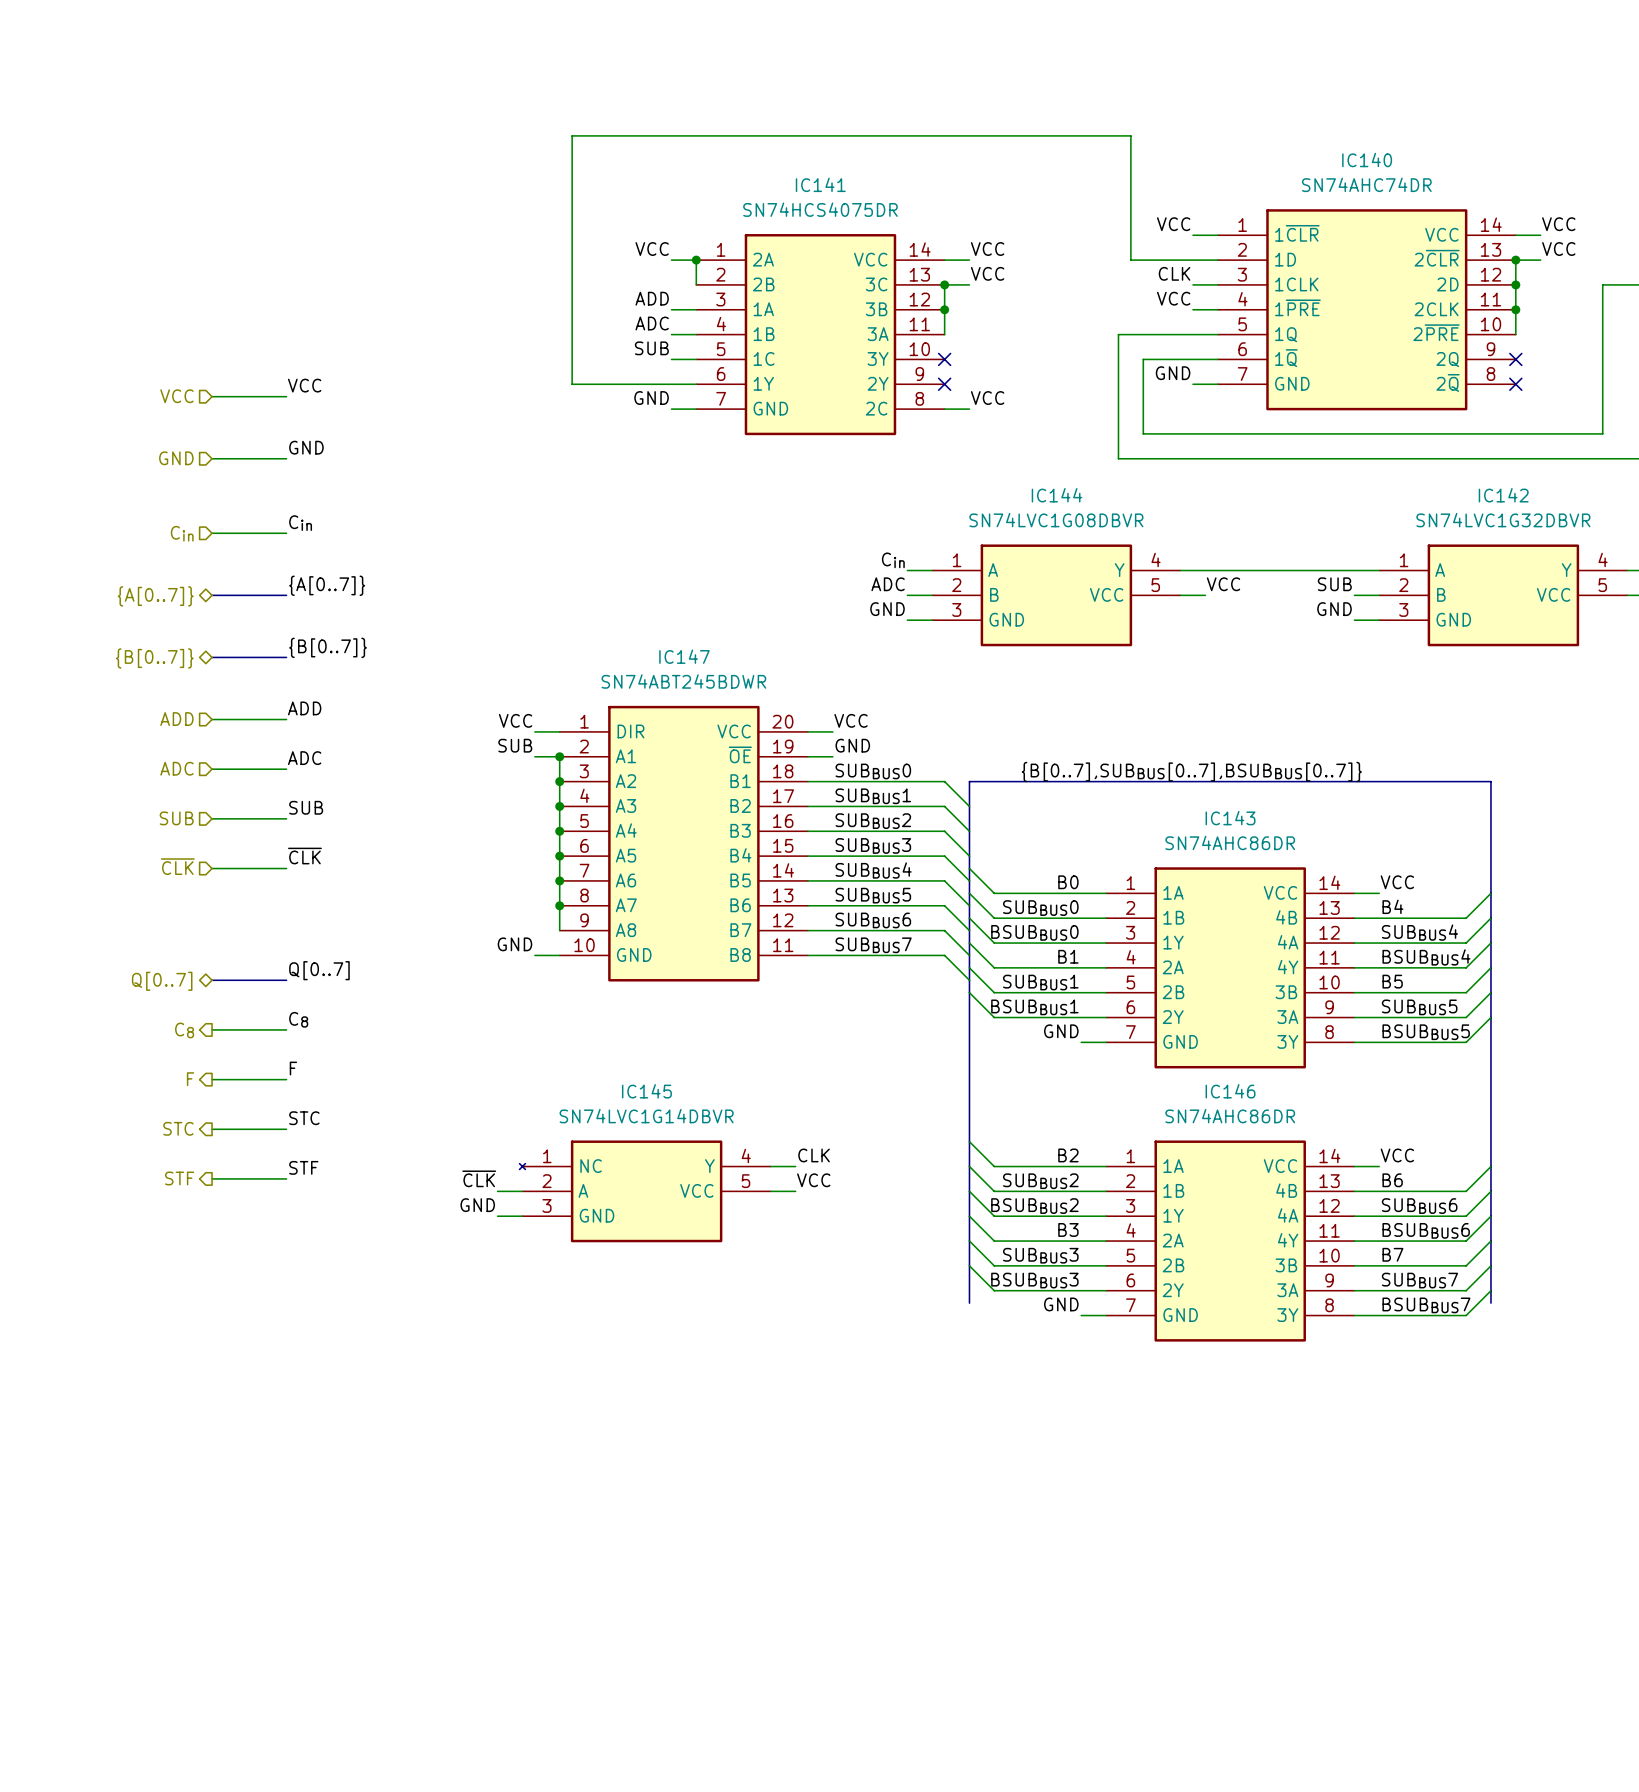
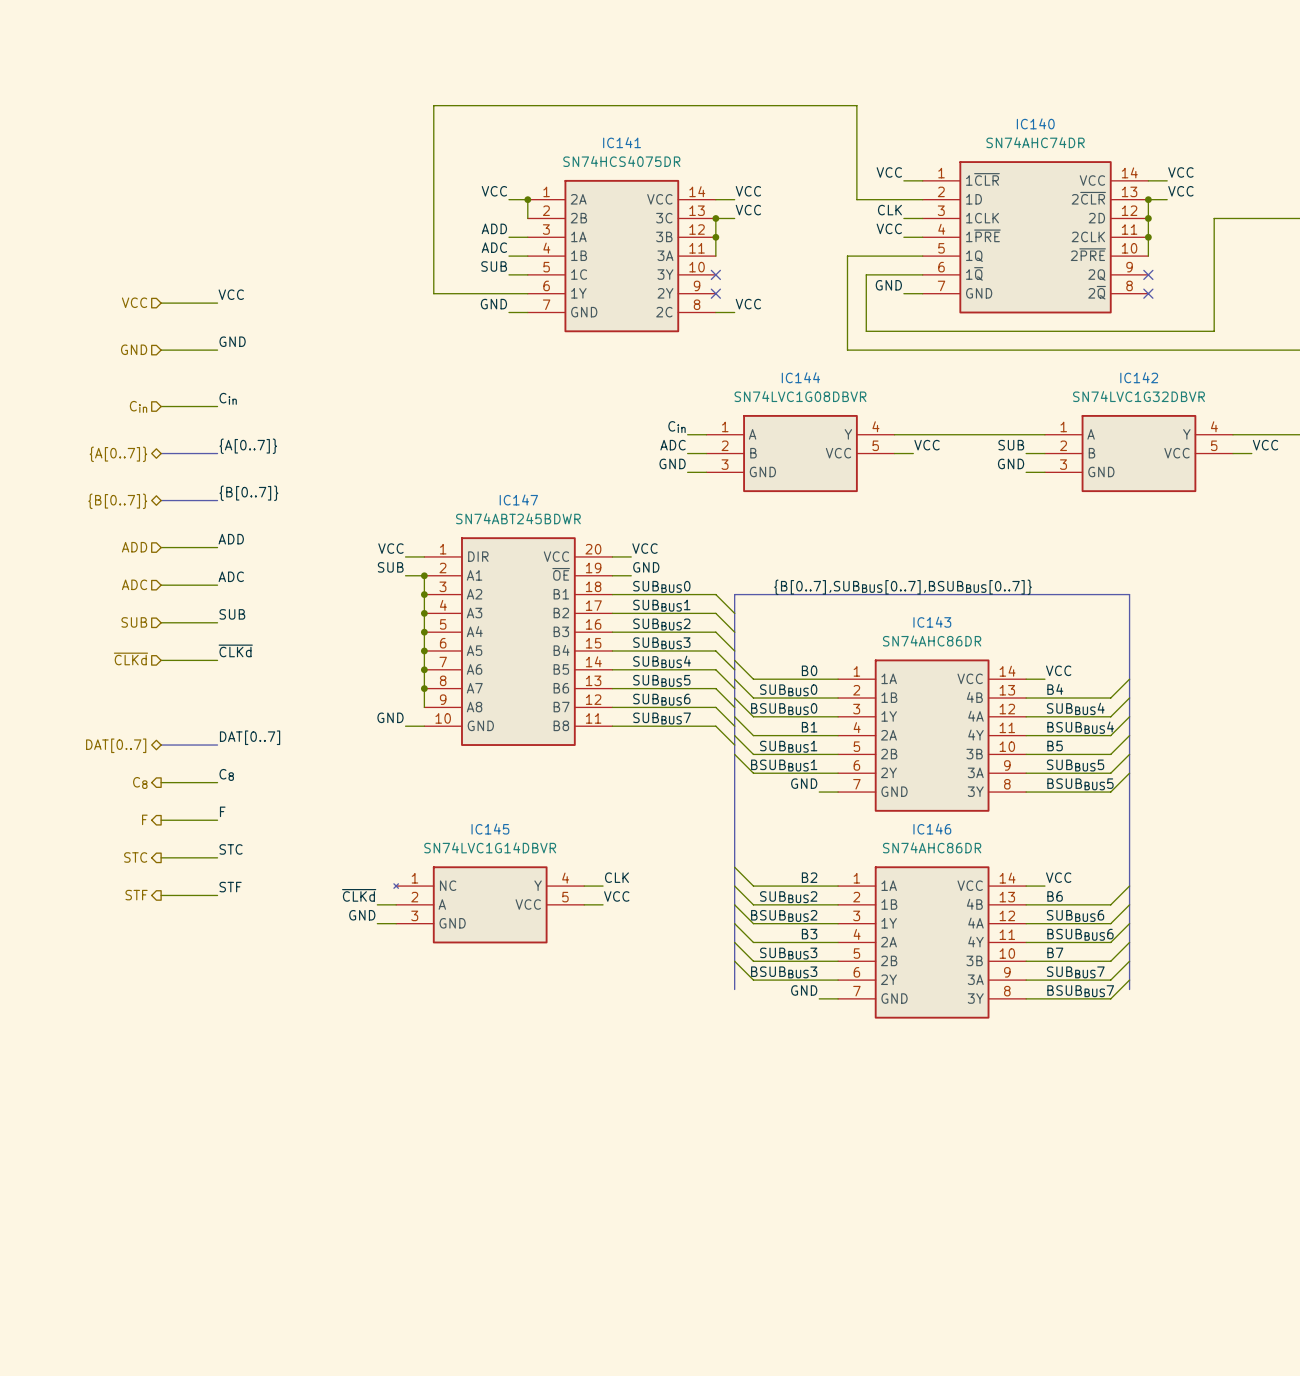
label: ~{CLK} (304, 856) -> ~{CLKd} (235, 650)
hierarchical label: ~{CLK} (177, 866) -> ~{CLKd} (130, 658)
label: Q[0..7] (319, 970) -> DAT[0..7] (250, 737)
hierarchical label: Q[0..7] (162, 981) -> DAT[0..7] (116, 745)
label: ~{CLK} (479, 1178) -> ~{CLKd} (359, 895)

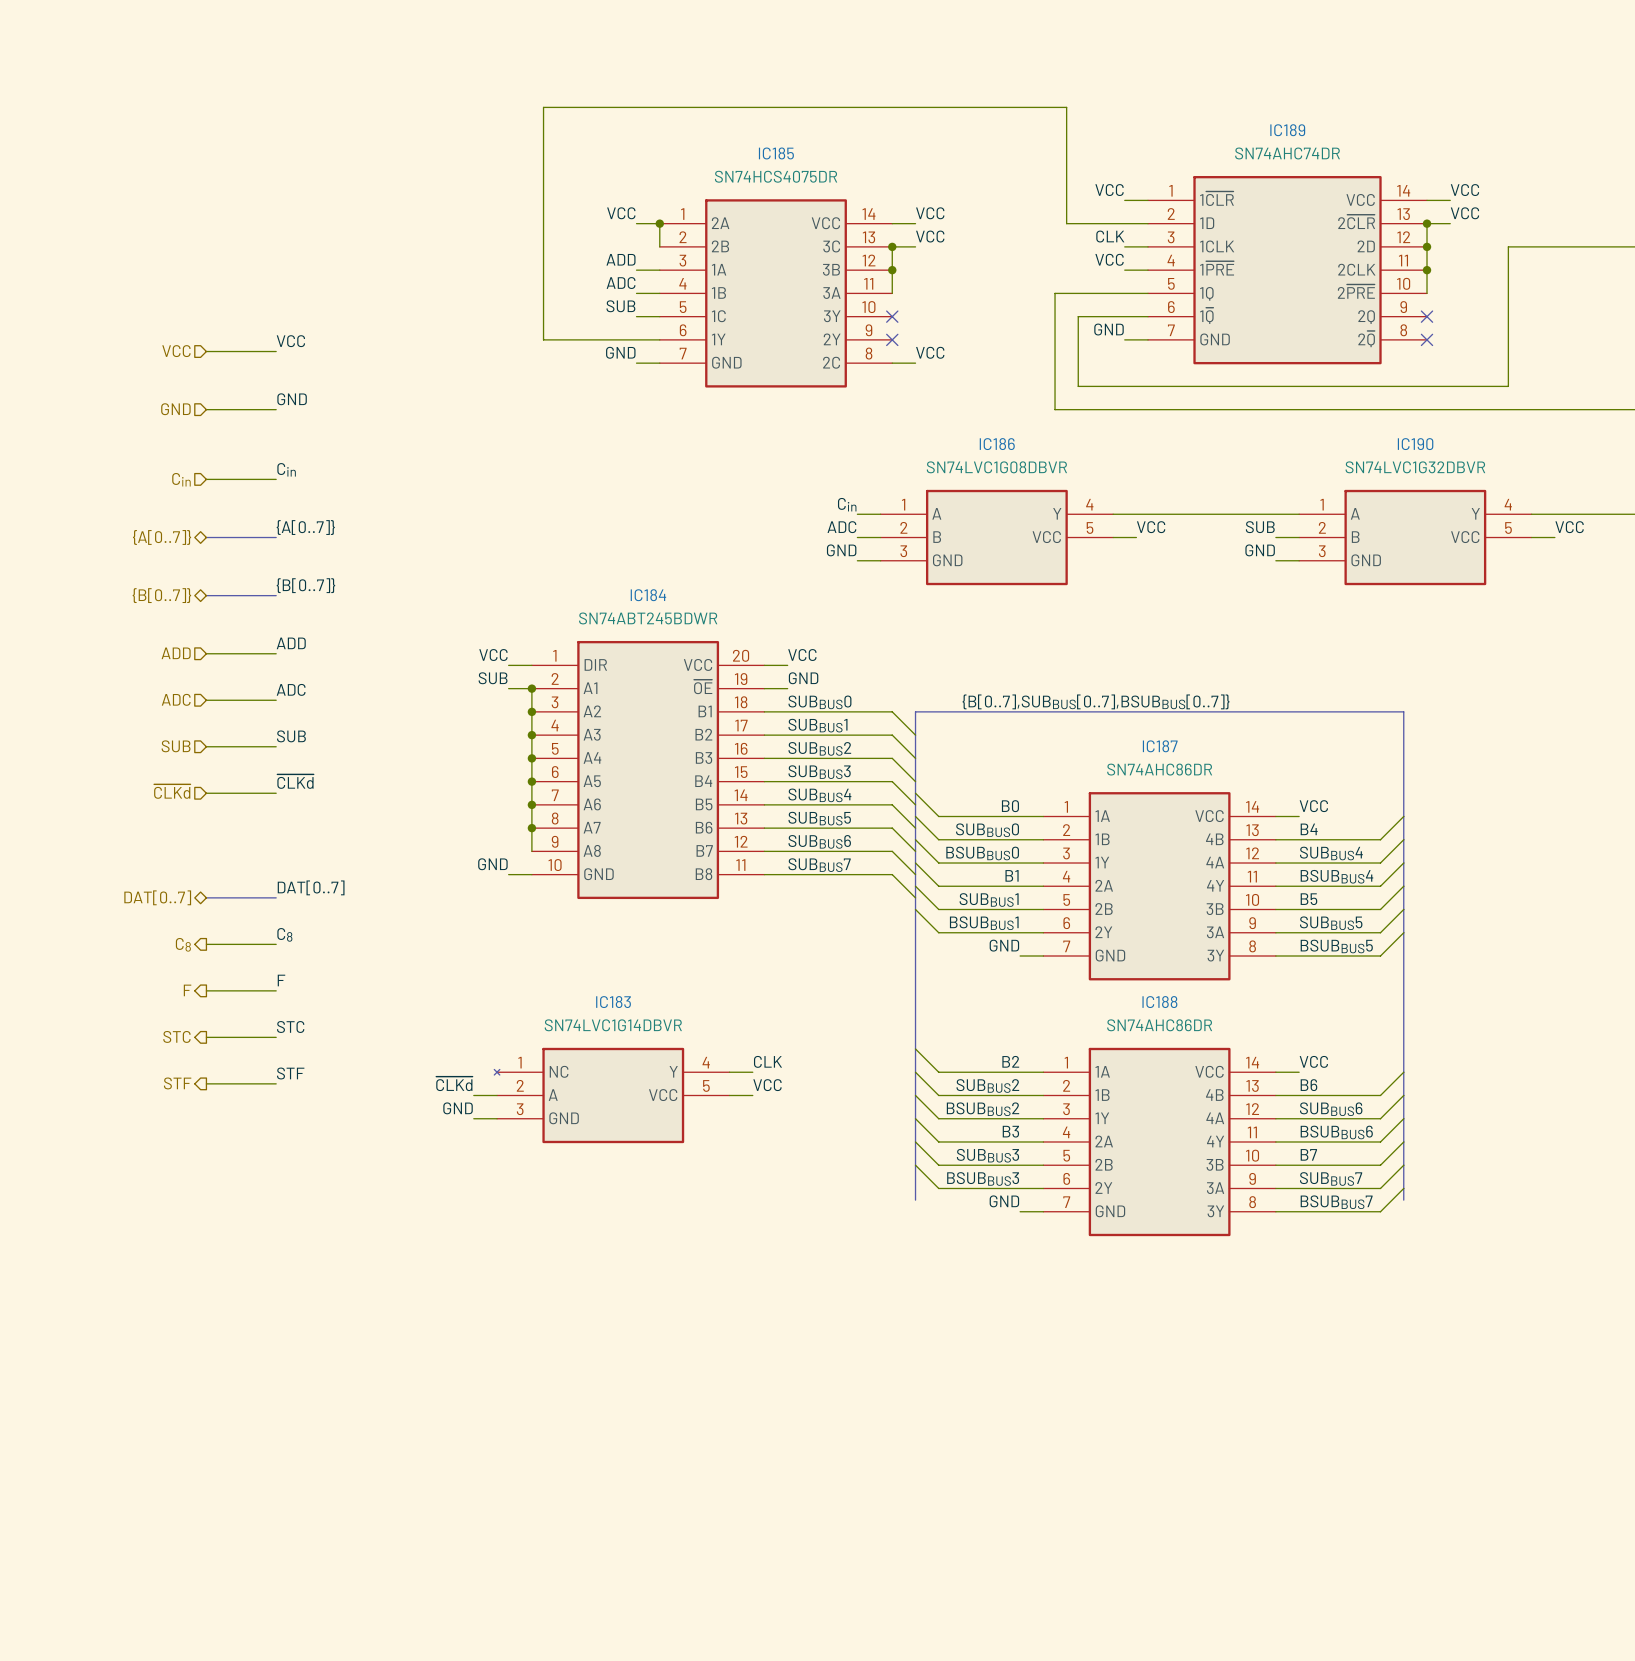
IC140 name: IC140 (1035, 123) -> IC189 (1287, 130)
IC141 name: IC141 (622, 142) -> IC185 (776, 153)
IC144 name: IC144 (800, 377) -> IC186 (997, 444)
IC142 name: IC142 (1139, 377) -> IC190 (1415, 444)
IC147 name: IC147 (518, 499) -> IC184 (648, 595)
IC143 name: IC143 (932, 622) -> IC187 (1160, 746)
IC145 name: IC145 (490, 829) -> IC183 (613, 1002)
IC146 name: IC146 (932, 829) -> IC188 (1159, 1002)

